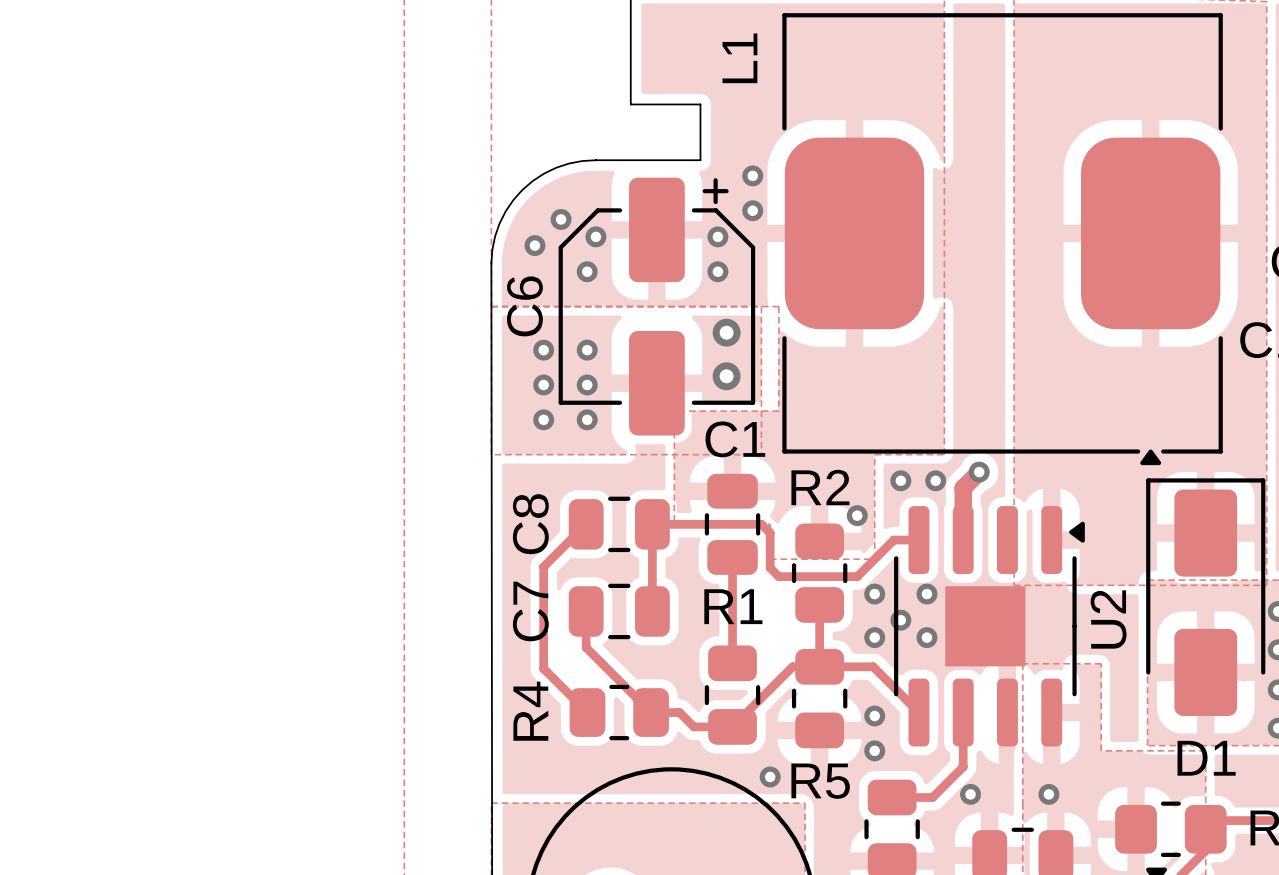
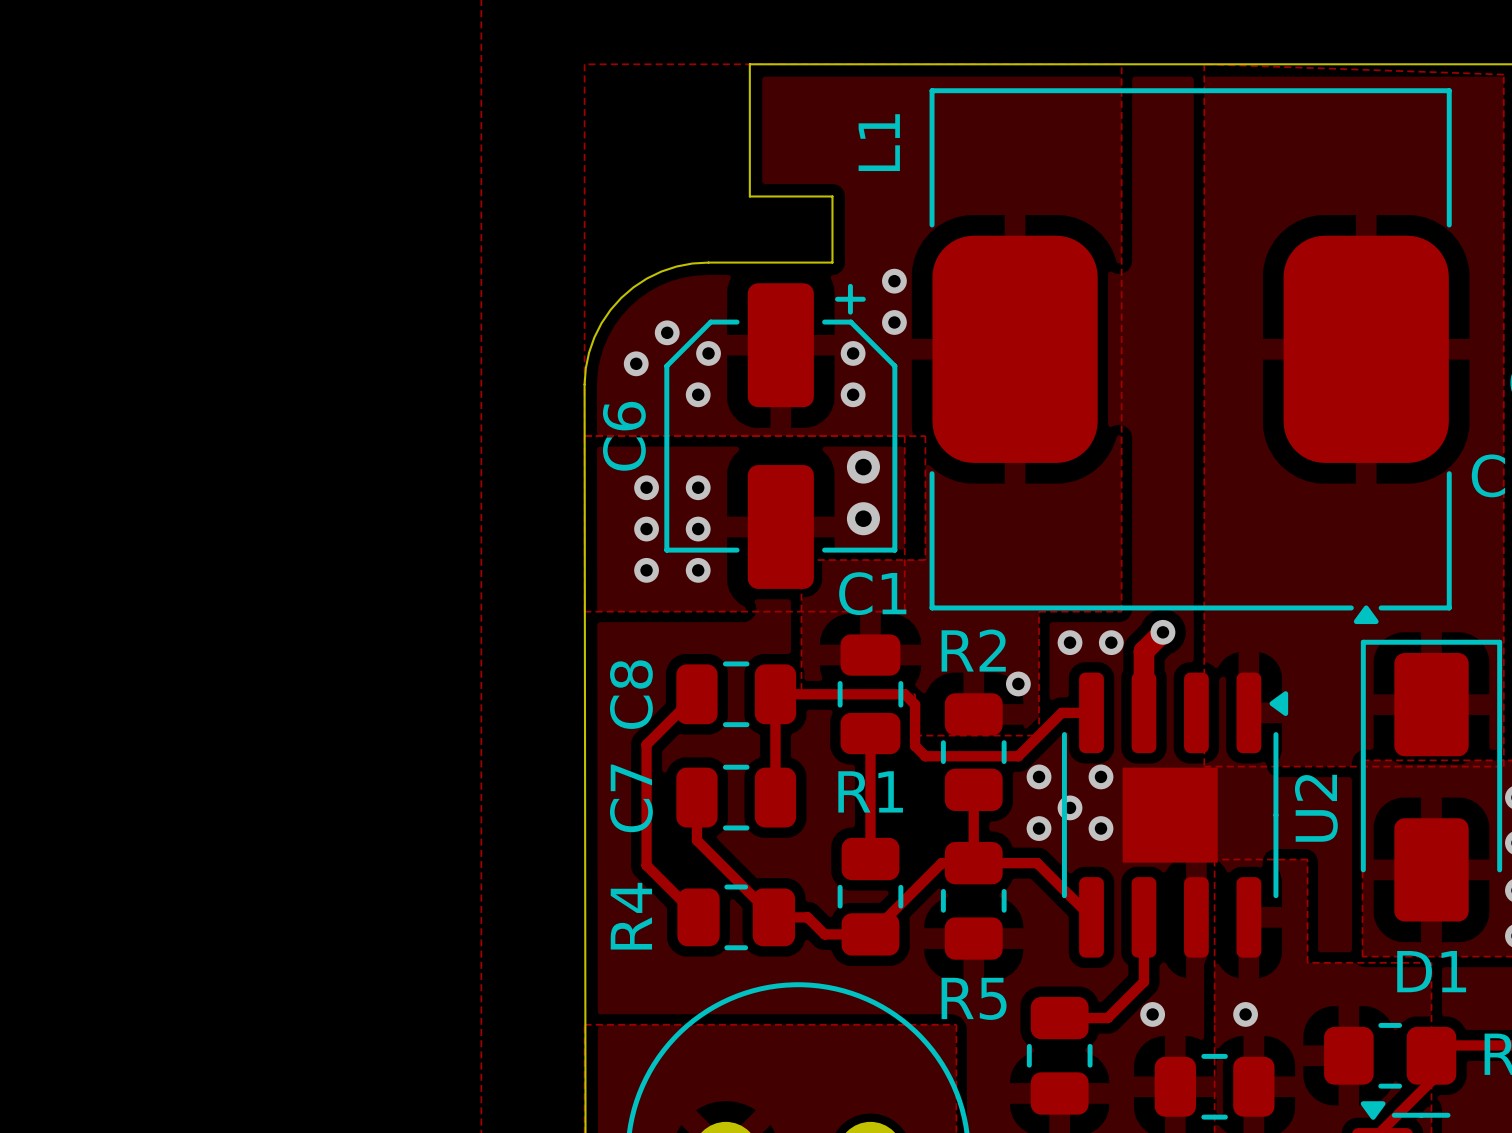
via: (874, 716) -> none
via: (874, 750) -> none
via: (770, 776) -> none

